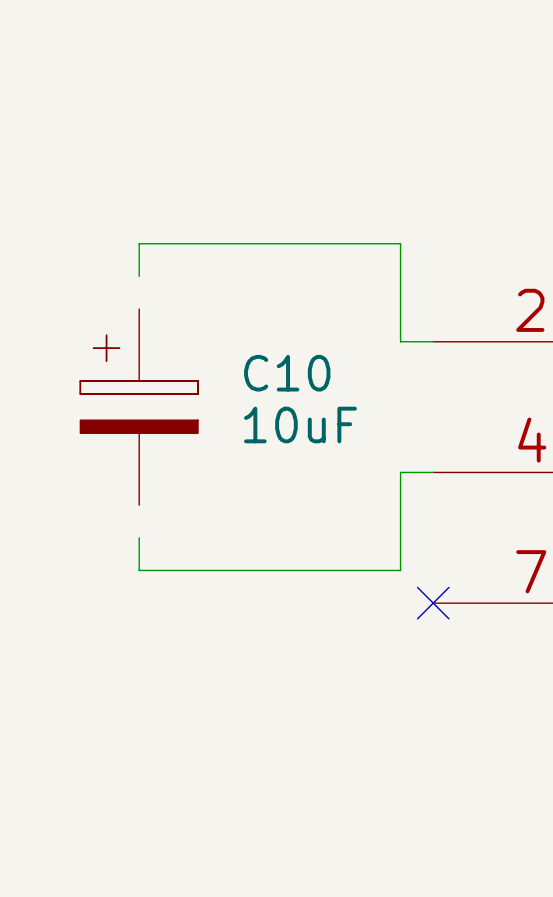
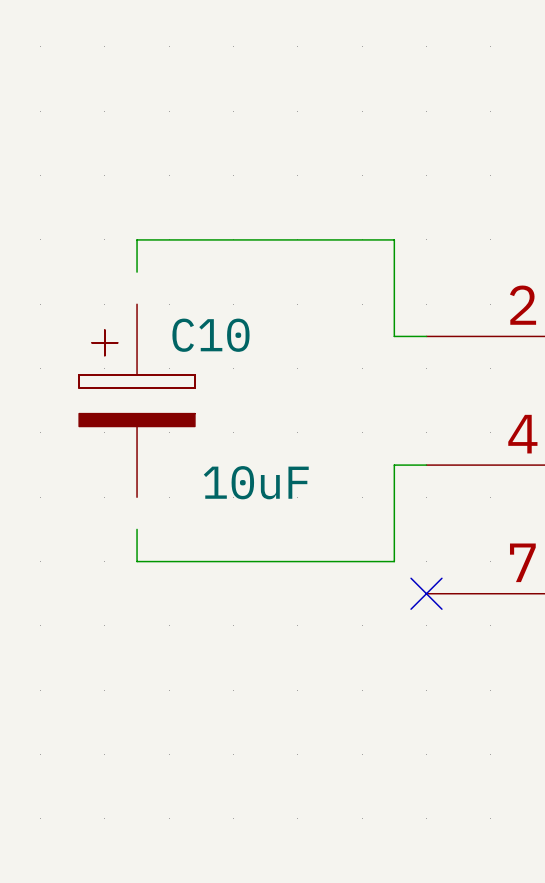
C10 name position: C10 (287, 373) -> C10 (210, 335)
C10 value position: 10uF (300, 425) -> 10uF (256, 482)

